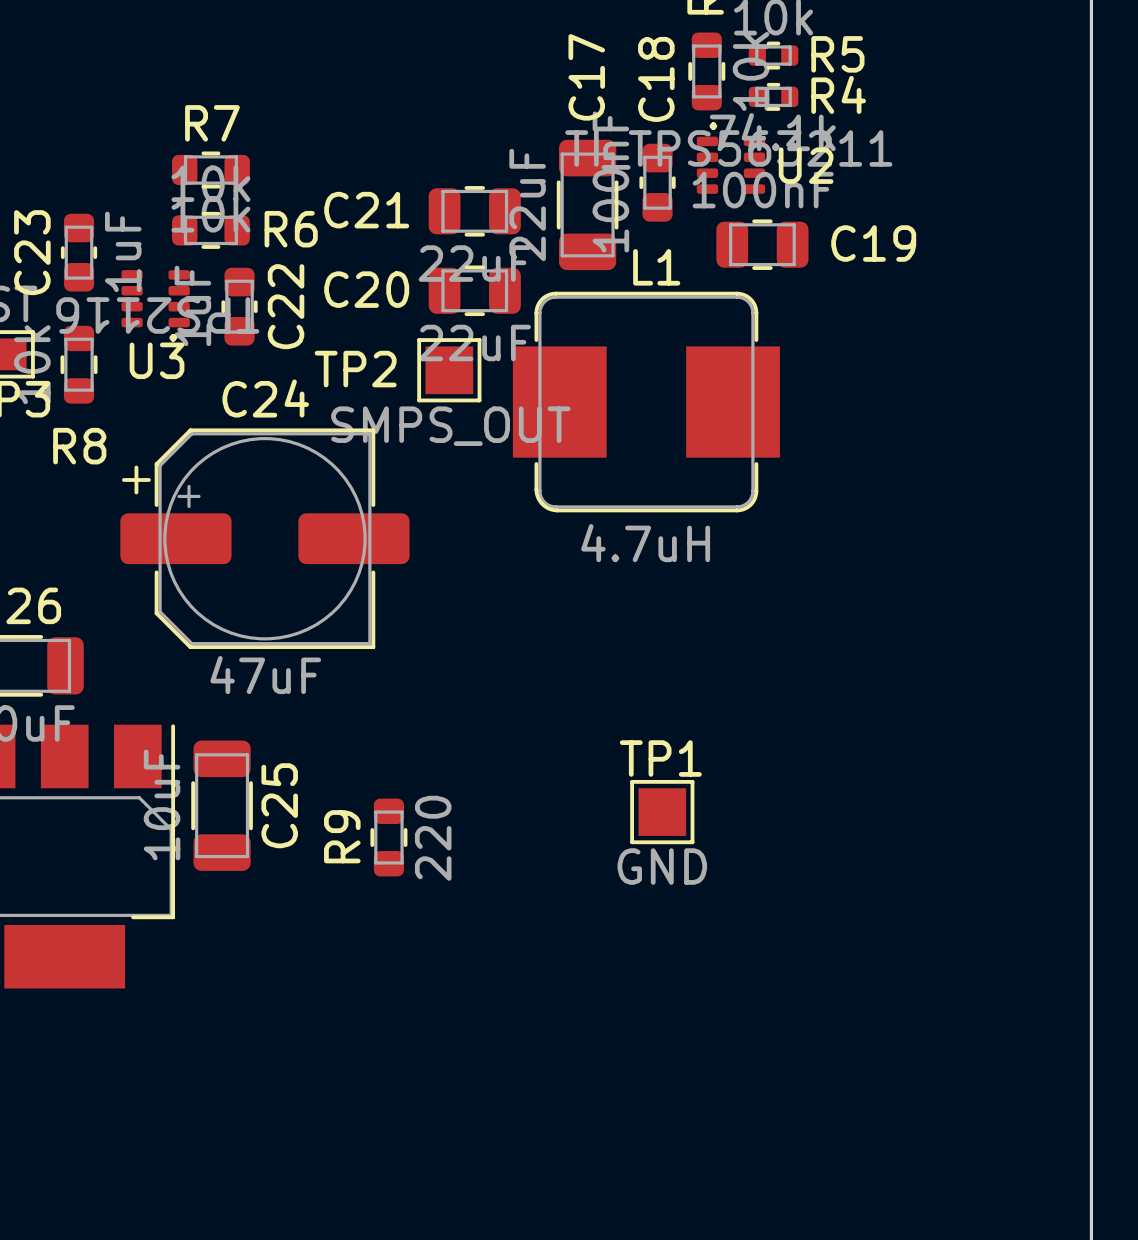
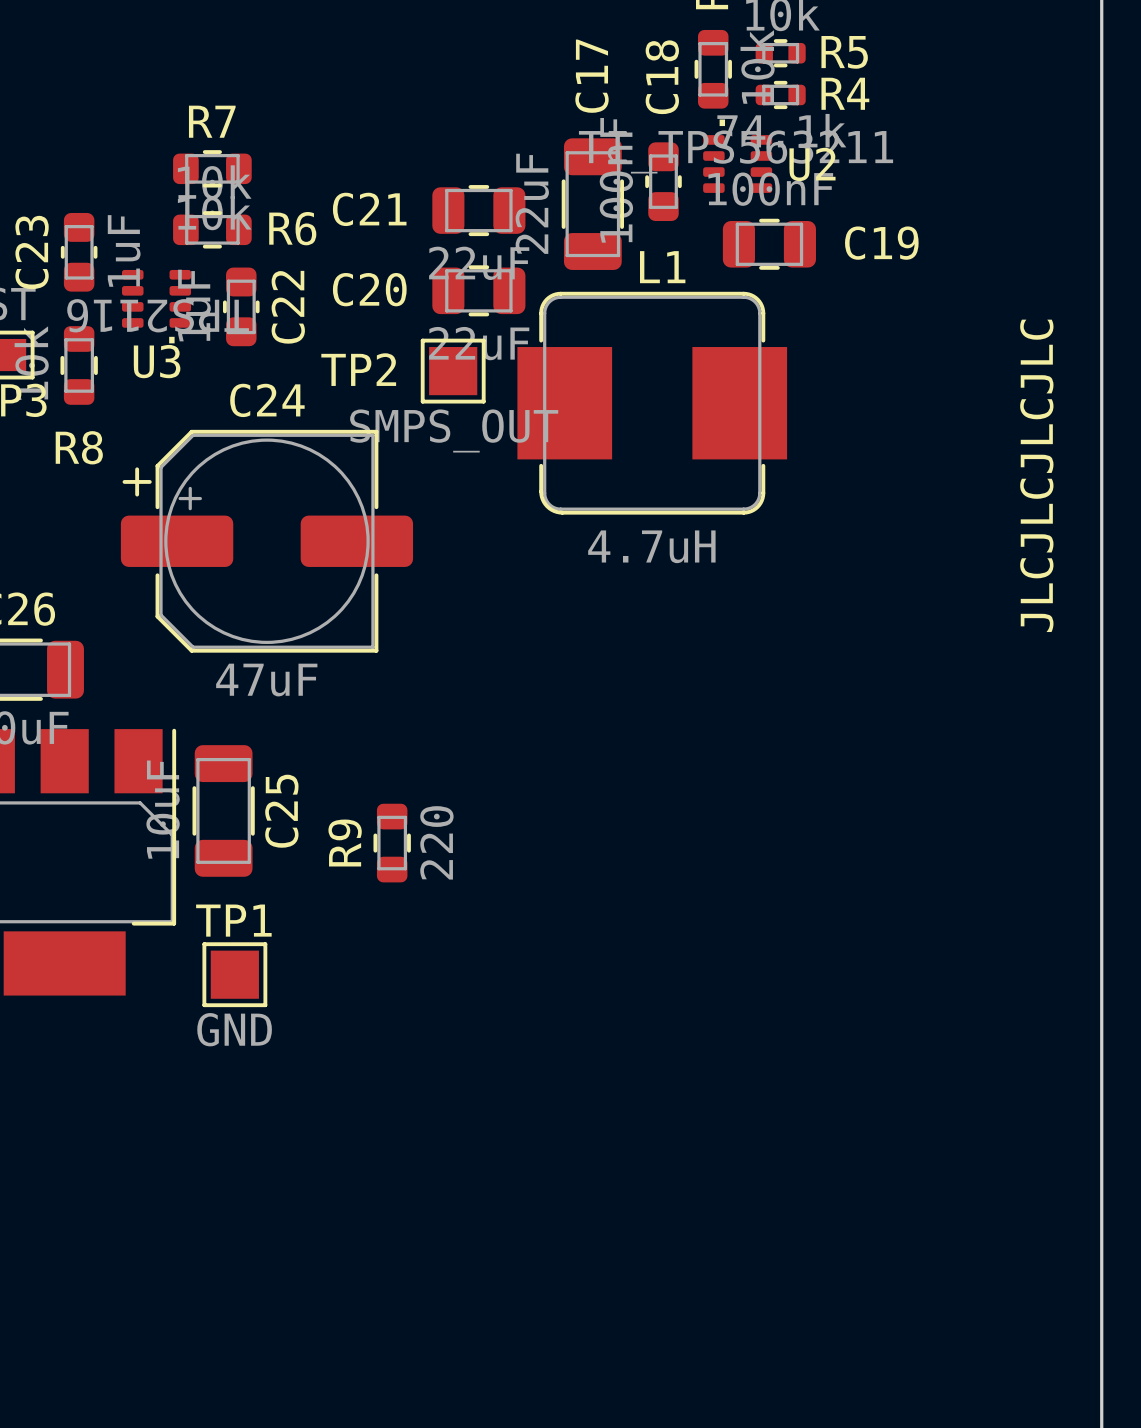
text: none -> JLCJLCJLCJLC (1036, 475)
TP1 position: (662, 812) -> (234, 974)

